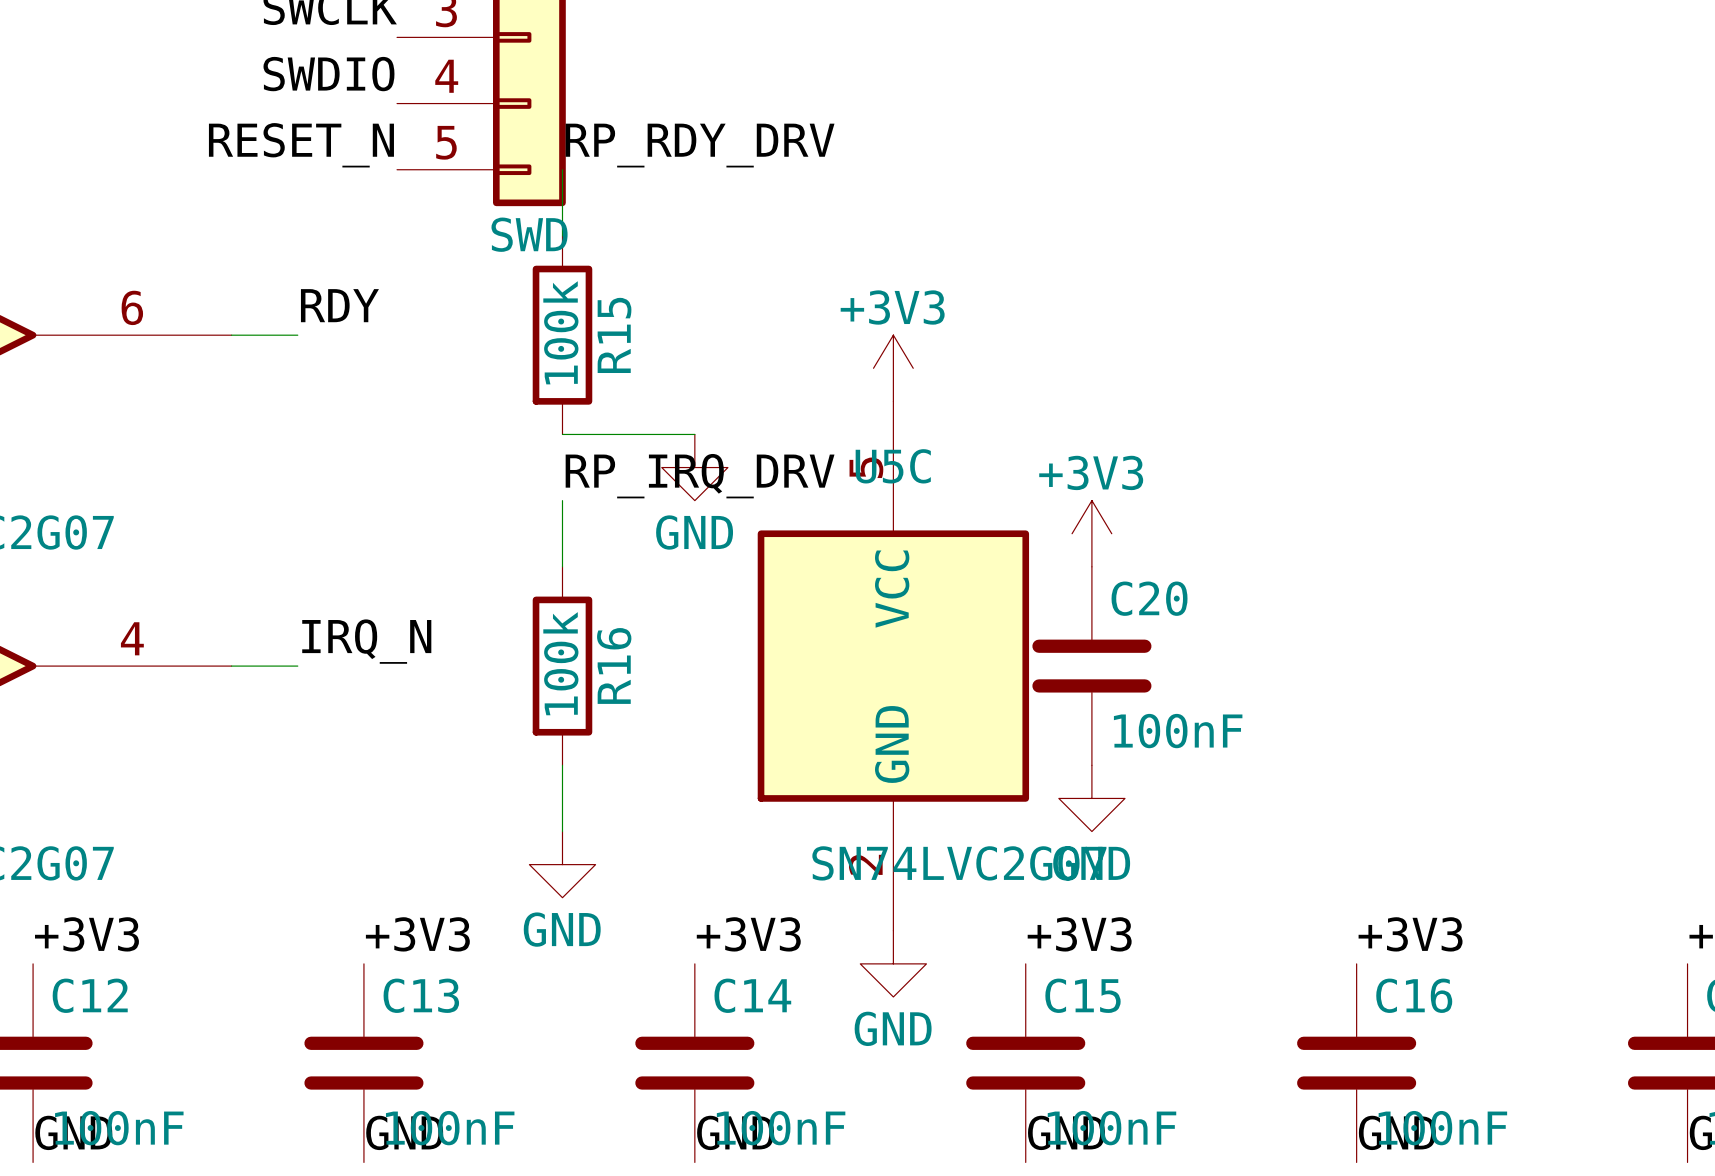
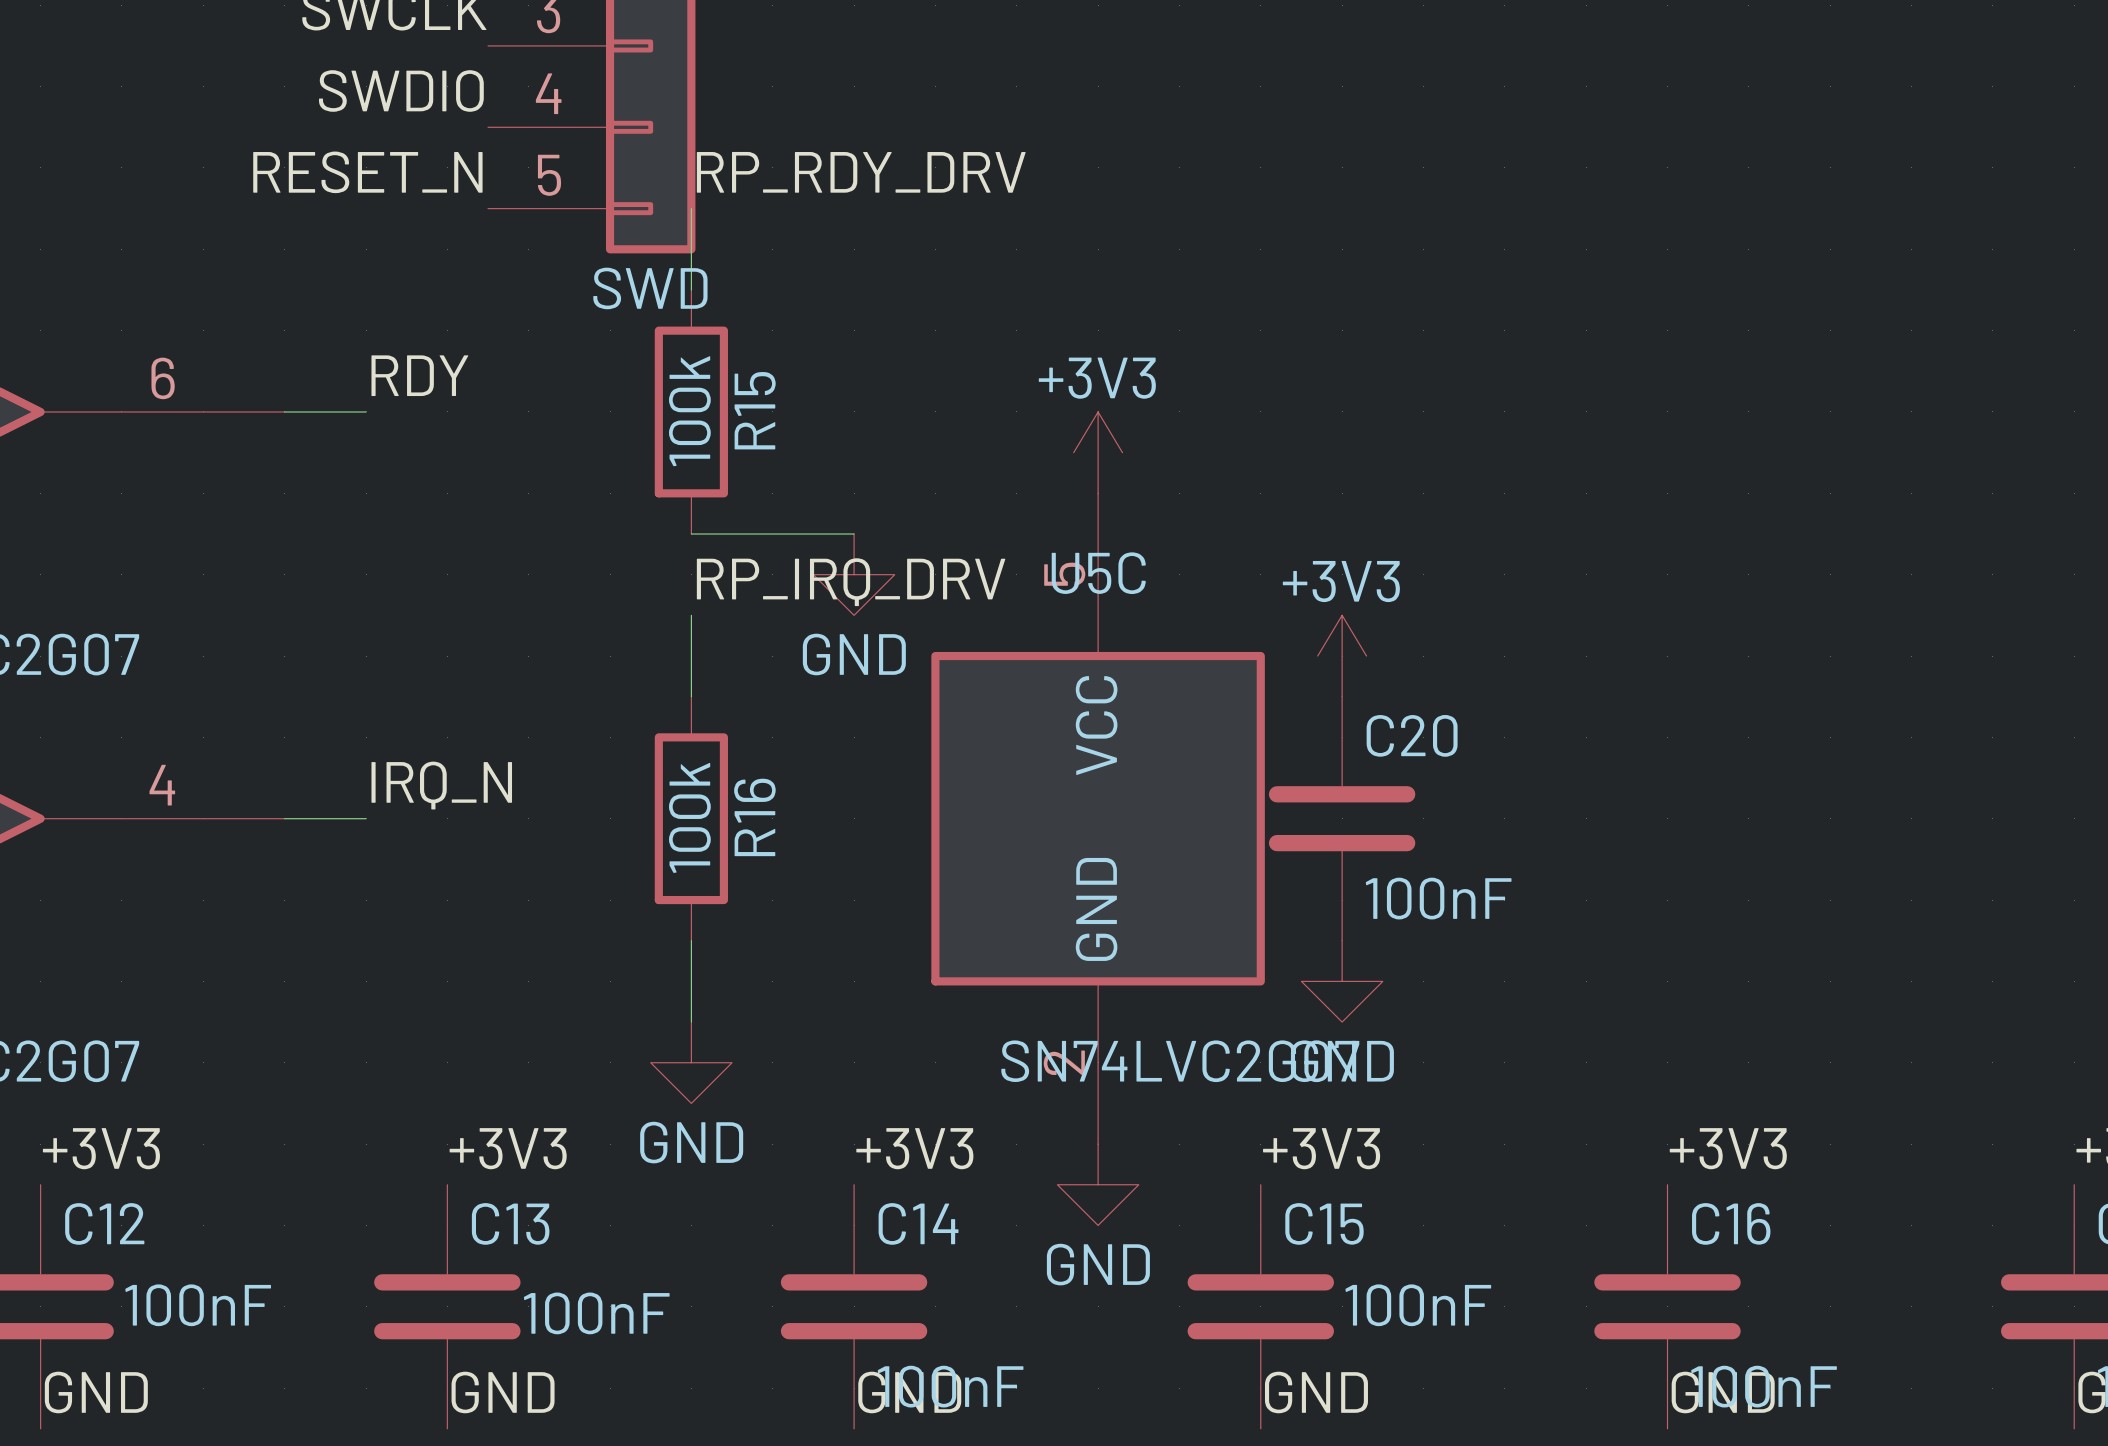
C12 value position: 100nF (119, 1128) -> 100nF (198, 1305)
C13 value position: 100nF (450, 1128) -> 100nF (596, 1313)
C15 value position: 100nF (1111, 1128) -> 100nF (1418, 1305)

